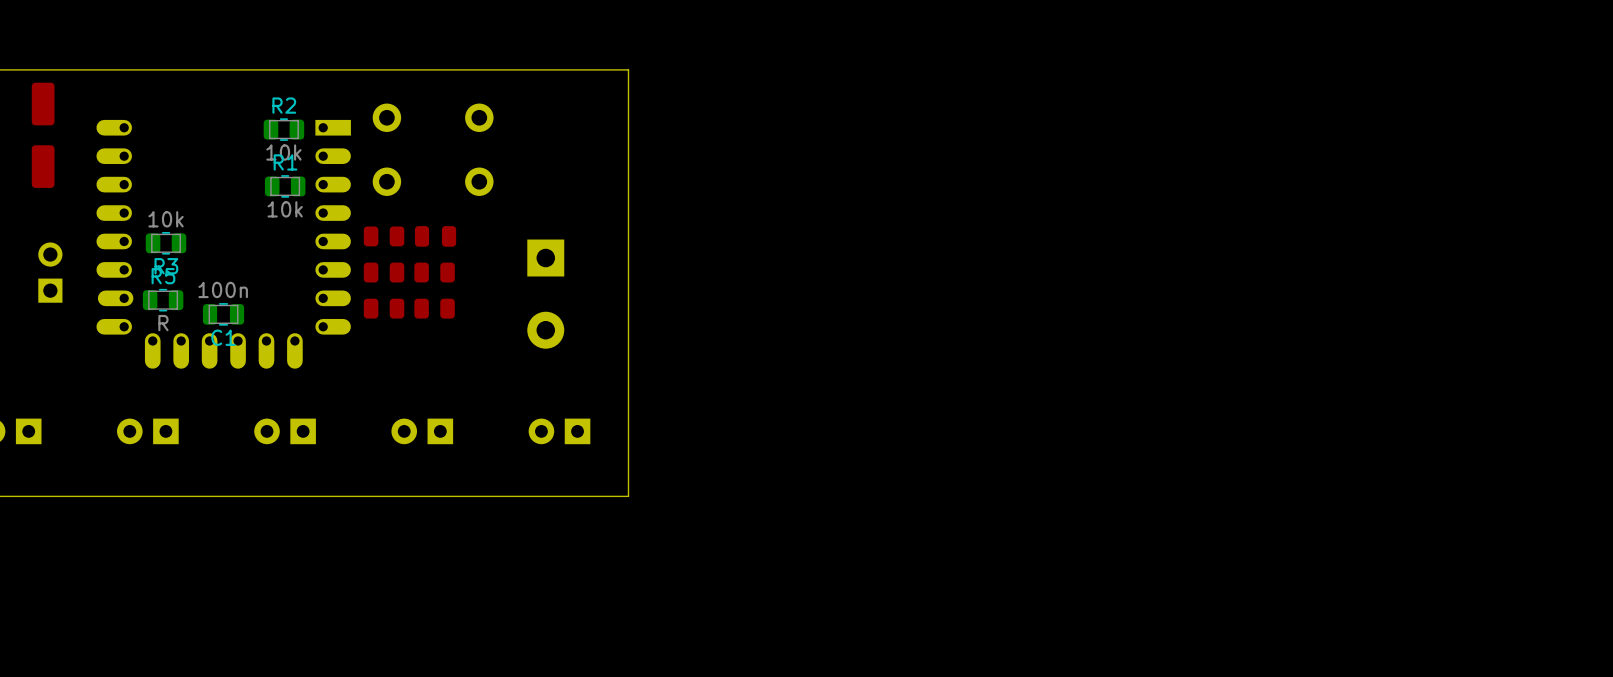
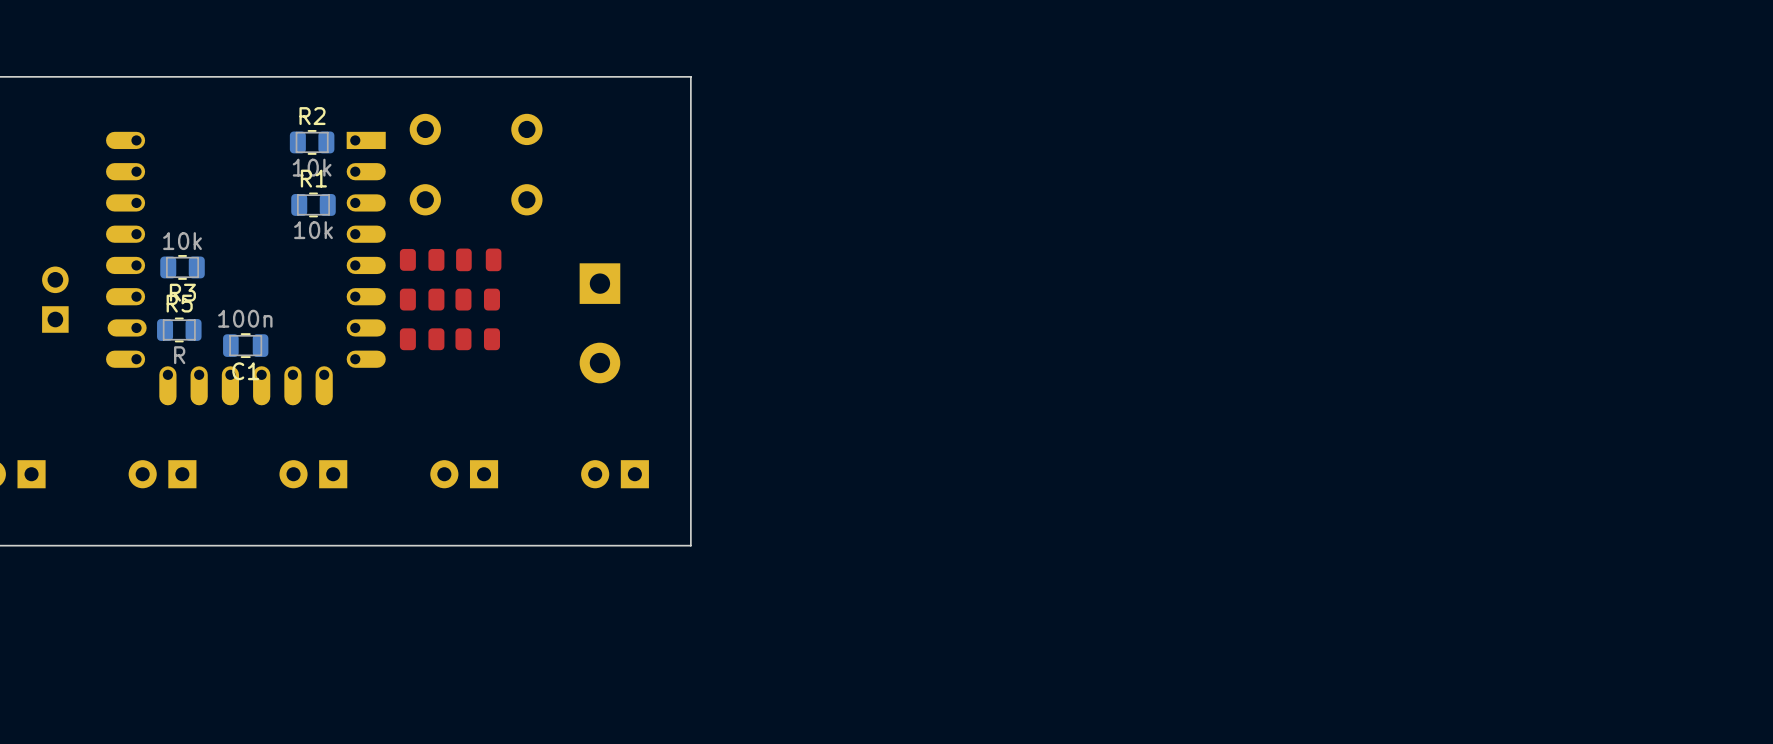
part: (43, 135) -> none

